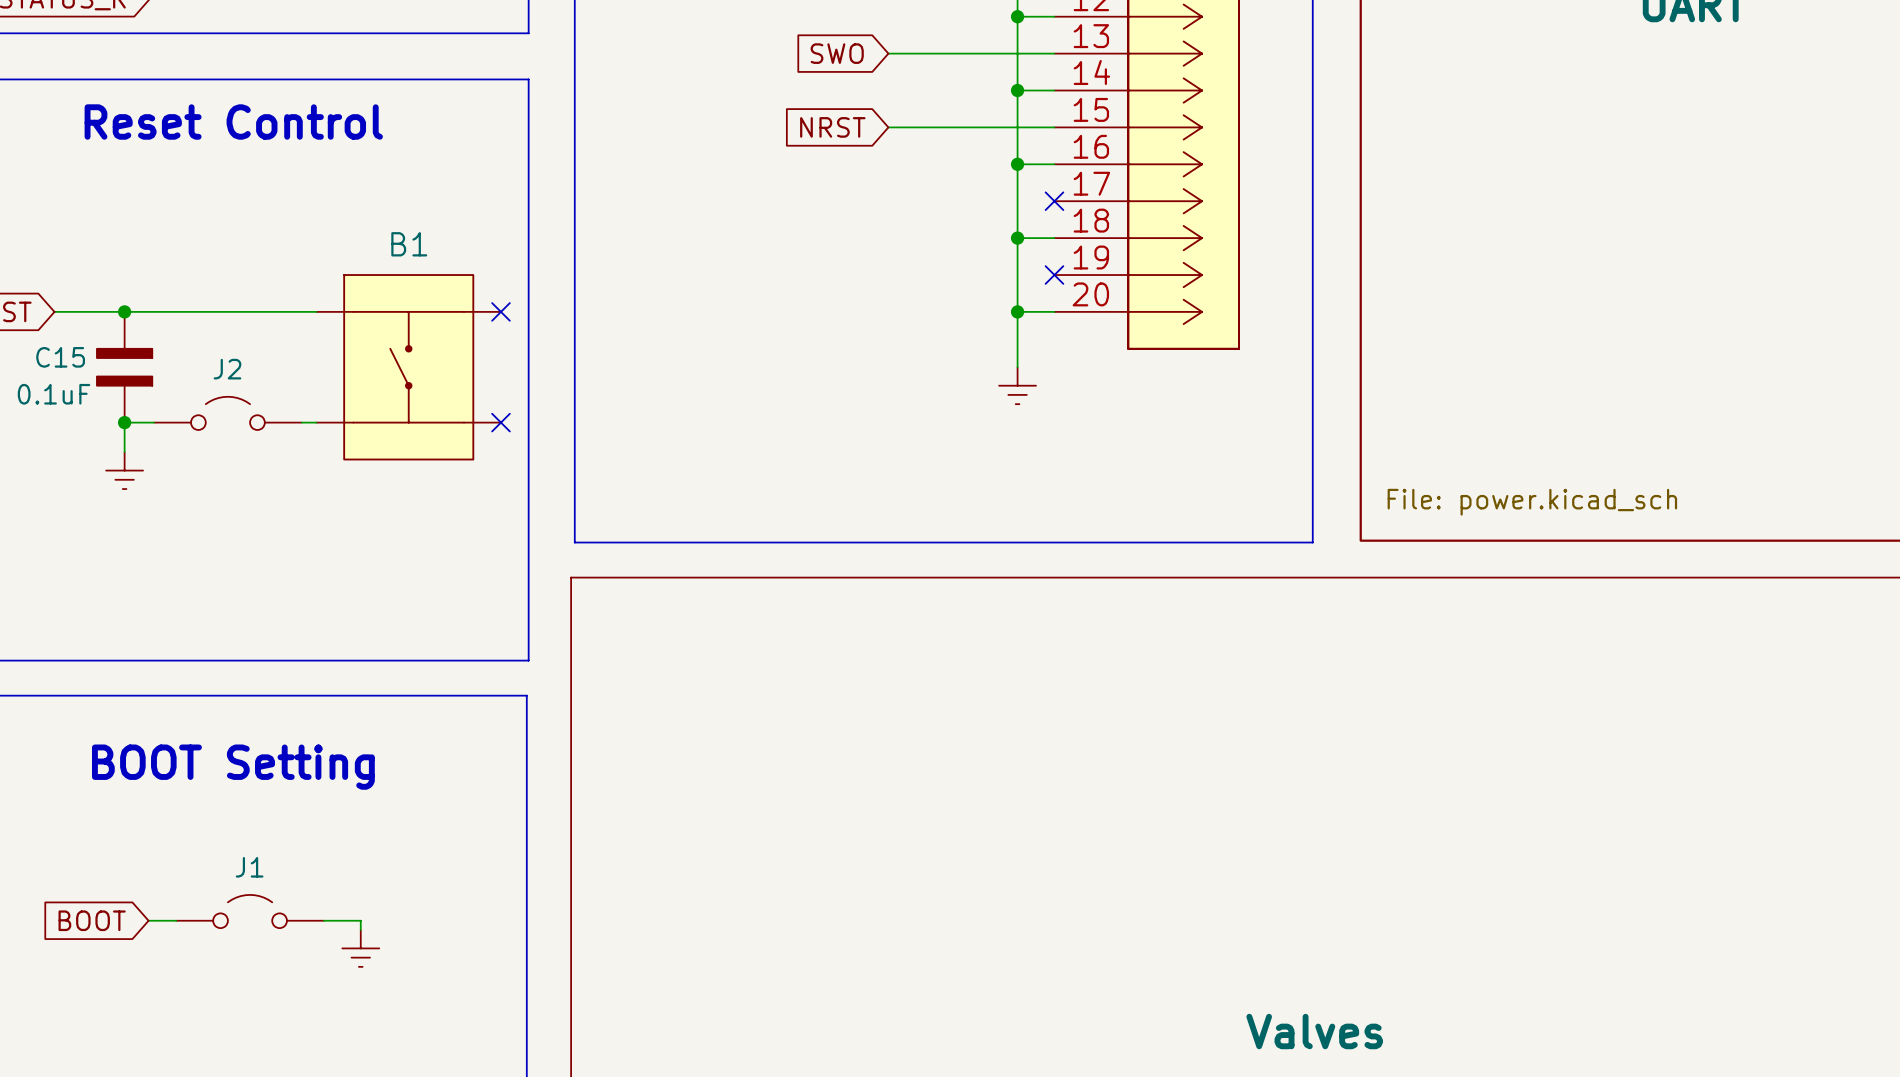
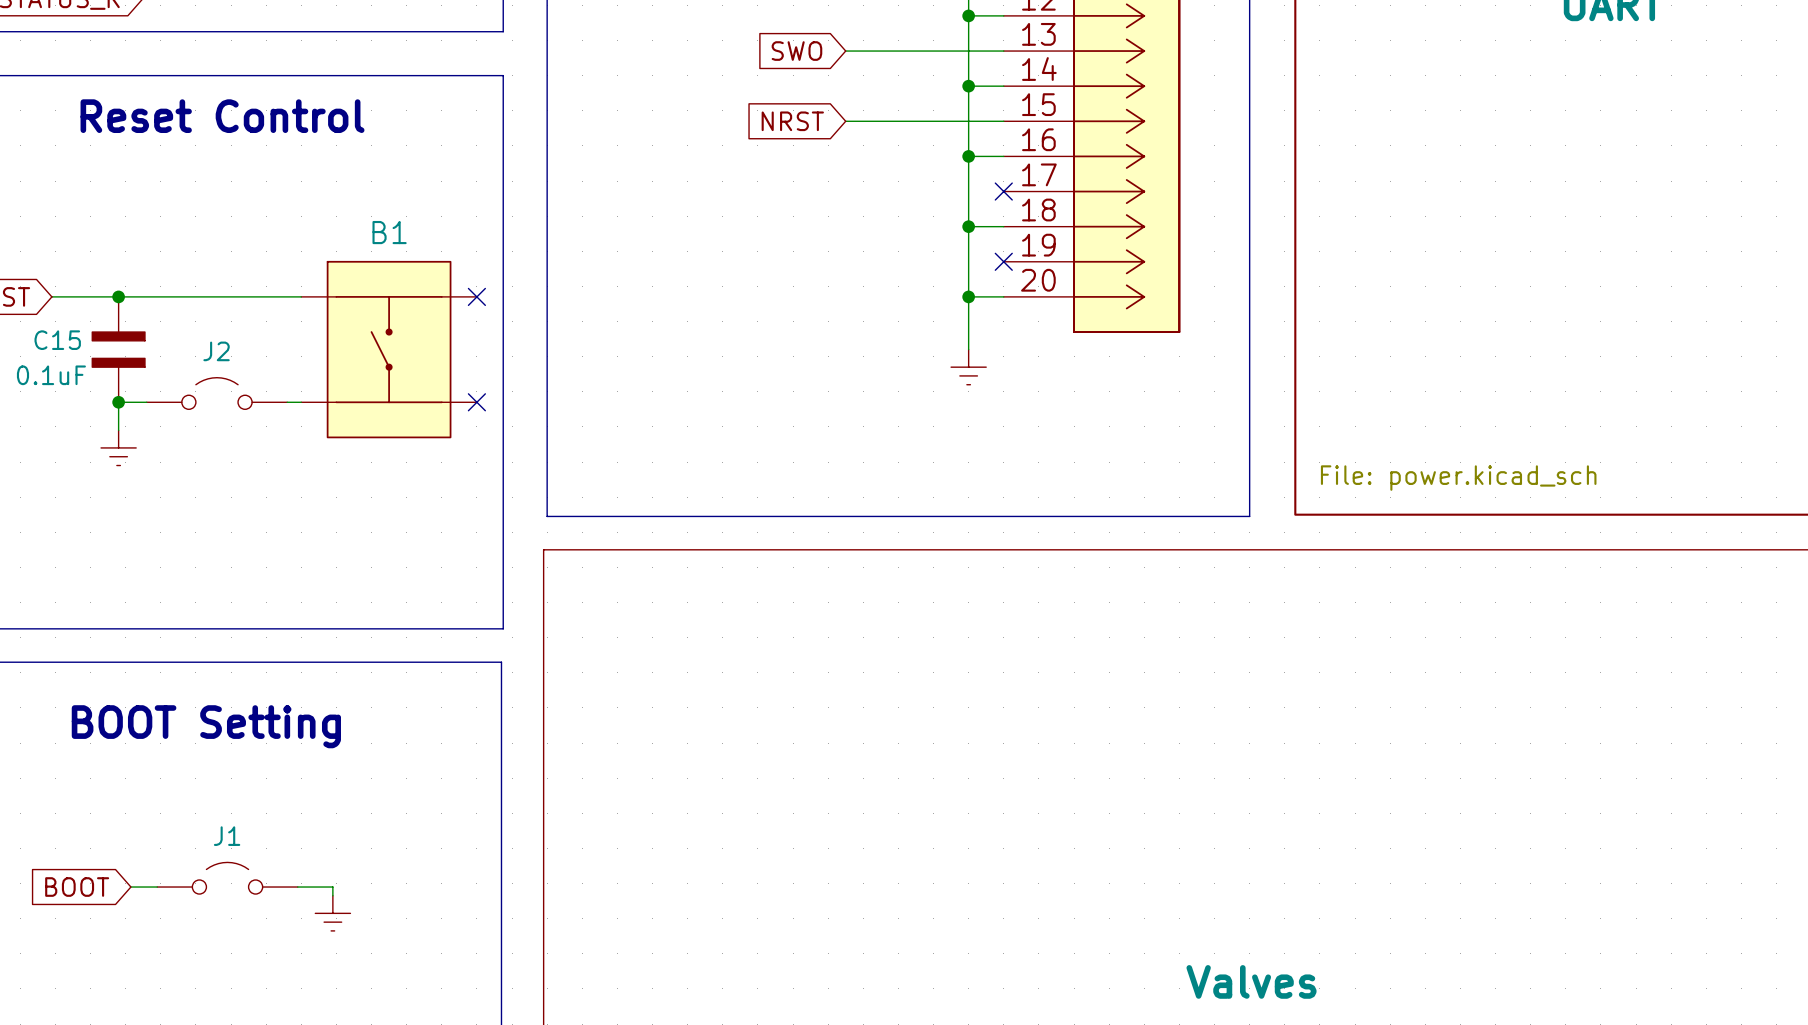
text position: BOOT Setting (233, 767) -> BOOT Setting (206, 726)
J1 position: (250, 911) -> (227, 878)
global label position: BOOT (92, 920) -> BOOT (77, 887)
wire: (148, 920) (176, 920) -> (130, 887) (157, 887)
wire: (323, 920) (360, 920) (360, 929) -> (297, 887) (332, 887) (332, 895)
power symbol position: (360, 948) -> (332, 913)

